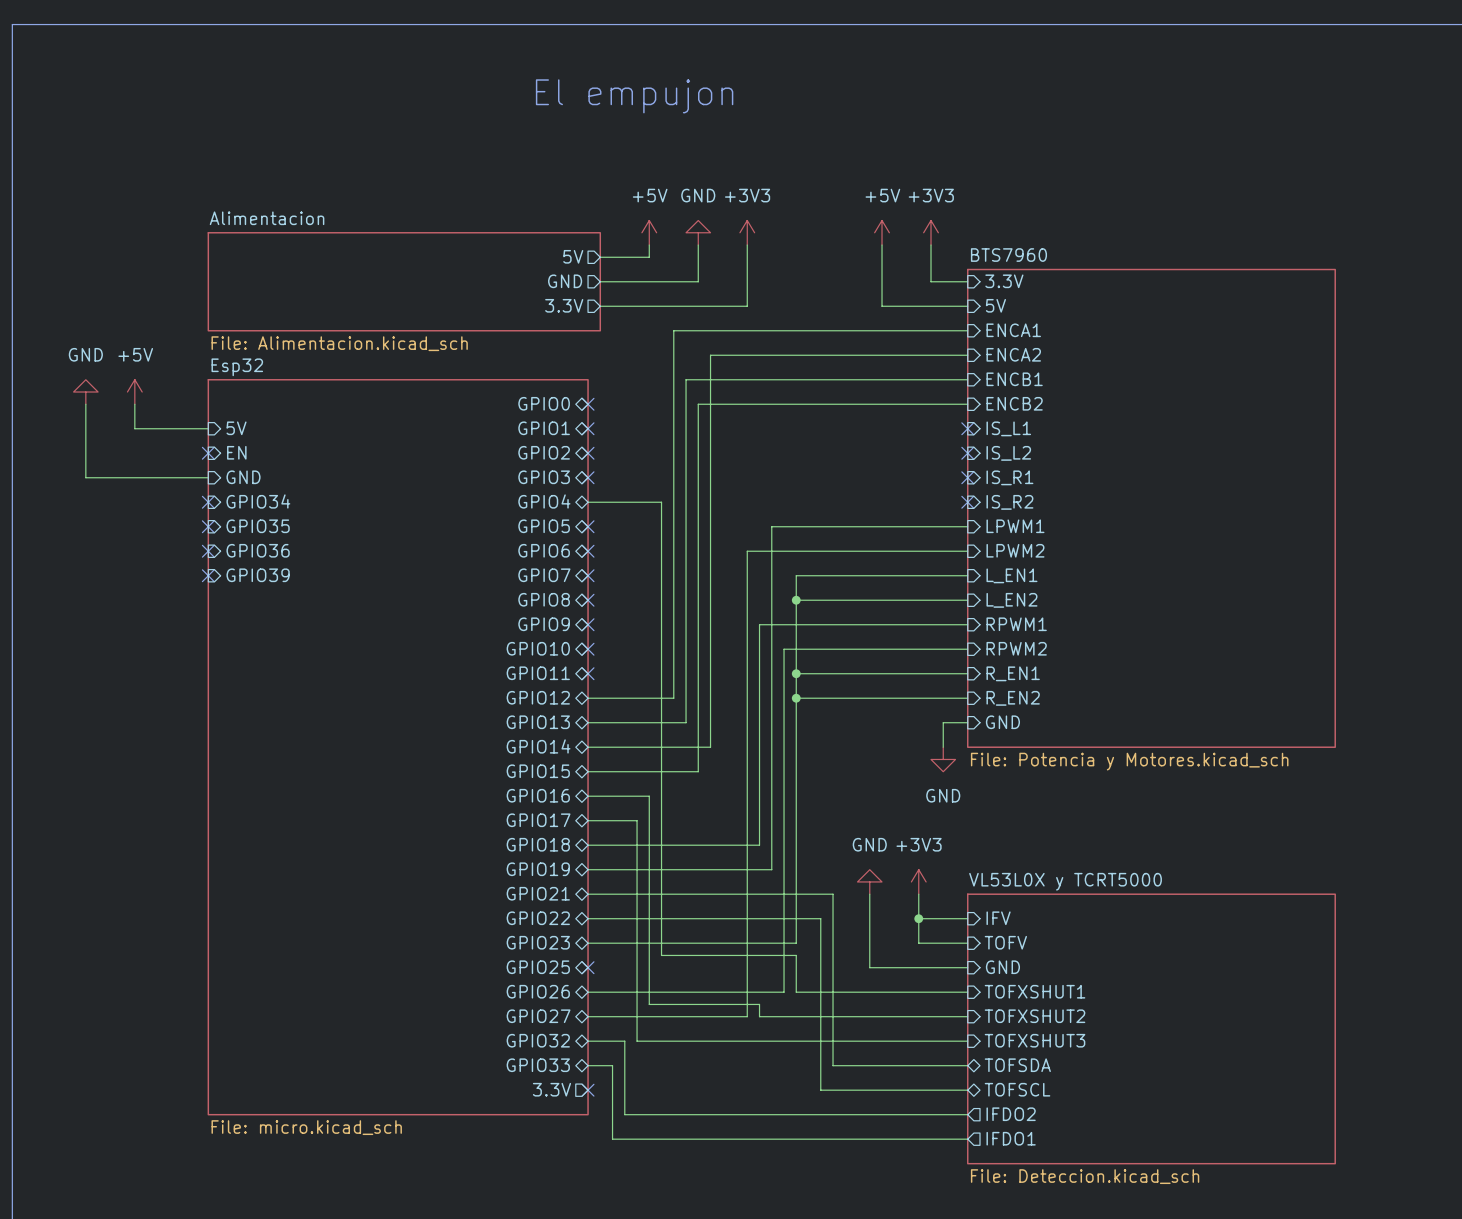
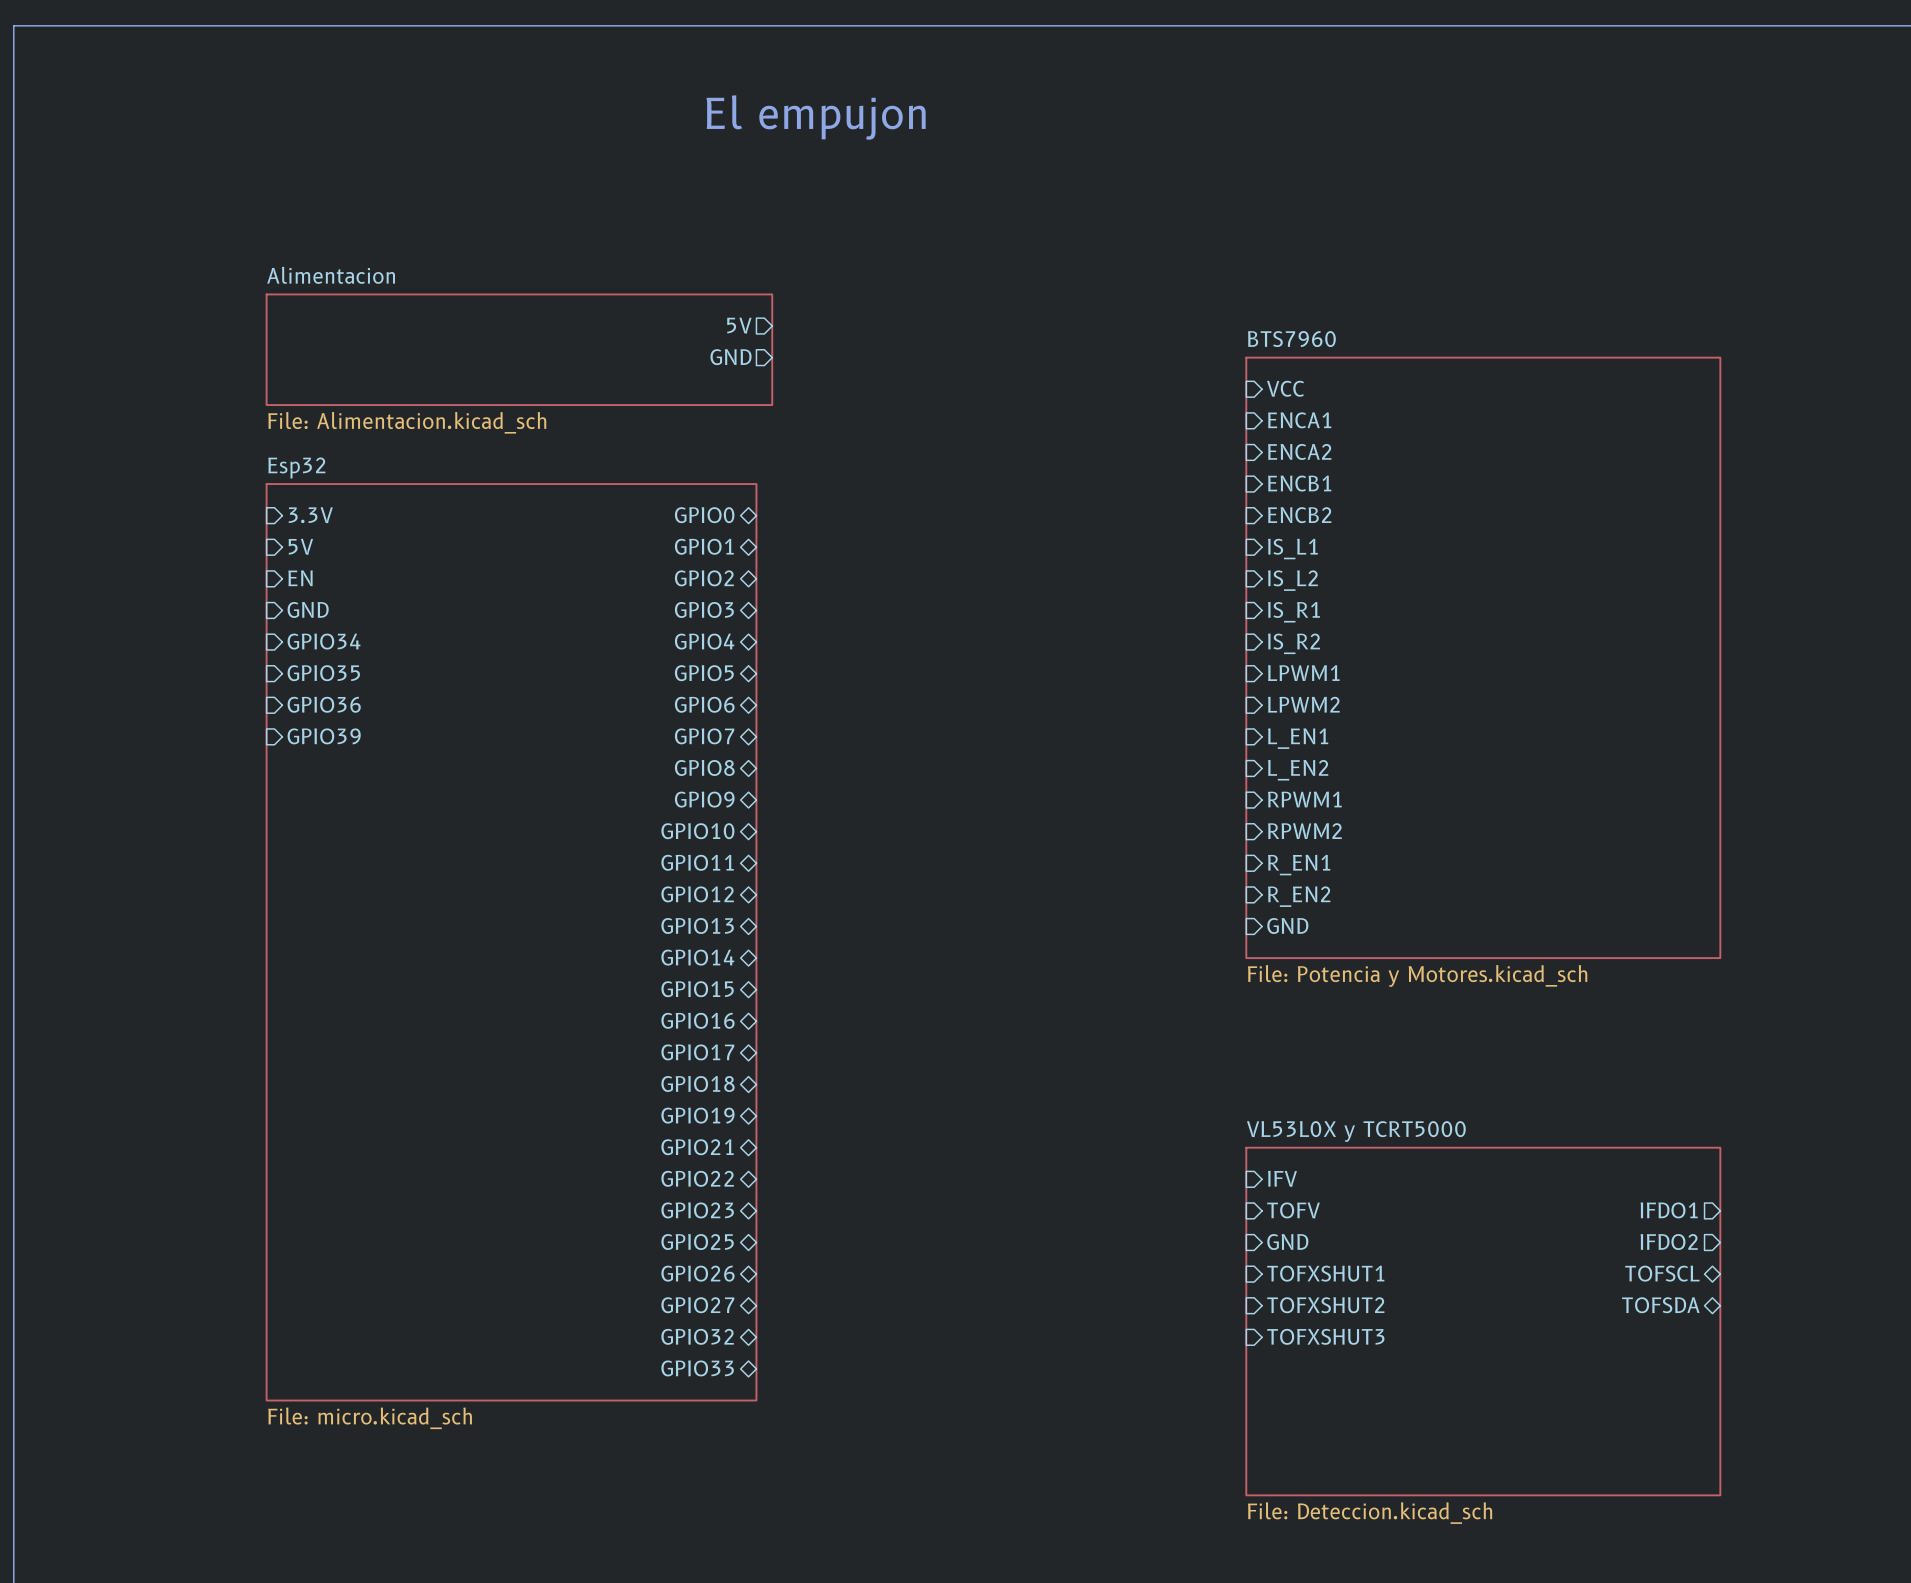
sheet Alimentacion shape: [207, 232, 602, 332] -> [265, 293, 774, 406]
power symbol: +5V (649, 232) -> none
power symbol: GND (698, 232) -> none
power symbol: +3V3 (747, 232) -> none
power symbol: +5V (882, 232) -> none
power symbol: +3V3 (931, 232) -> none
wire: (649, 245) (649, 257) (600, 257) -> none
wire: (698, 245) (698, 281) (600, 281) -> none
wire: (747, 245) (747, 306) (600, 306) -> none
wire: (882, 245) (882, 306) (967, 306) -> none
wire: (931, 245) (931, 281) (967, 281) -> none
sheet BTS7960 shape: [967, 268, 1336, 748] -> [1245, 356, 1722, 960]
sheet pin: 3.3V (1004, 281) -> none
sheet pin: 3.3V (564, 305) -> none
sheet pin: 5V (995, 305) -> VCC (1285, 388)
wire: (967, 330) (673, 330) (673, 698) (588, 698) -> none
wire: (967, 355) (710, 355) (710, 747) (588, 747) -> none
sheet Esp32 shape: [207, 379, 589, 1116] -> [265, 483, 758, 1402]
wire: (967, 379) (686, 379) (686, 722) (588, 722) -> none
power symbol: GND (85, 392) -> none
power symbol: +5V (134, 392) -> none
sheet pin: none -> 3.3V (310, 515)
wire: (85, 404) (85, 477) (208, 477) -> none
wire: (134, 404) (134, 428) (208, 428) -> none
no-connect mark: (588, 404) -> none
wire: (967, 404) (698, 404) (698, 771) (588, 771) -> none
no-connect mark: (588, 428) -> none
no-connect mark: (967, 428) -> none
no-connect mark: (208, 453) -> none
no-connect mark: (588, 453) -> none
no-connect mark: (967, 453) -> none
no-connect mark: (588, 477) -> none
no-connect mark: (967, 477) -> none
no-connect mark: (208, 502) -> none
wire: (588, 502) (661, 502) (661, 955) (796, 955) (796, 992) (967, 992) -> none
no-connect mark: (967, 502) -> none
no-connect mark: (208, 526) -> none
no-connect mark: (588, 526) -> none
wire: (967, 526) (771, 526) (771, 869) (588, 869) -> none
no-connect mark: (208, 551) -> none
no-connect mark: (588, 551) -> none
wire: (967, 551) (747, 551) (747, 1016) (588, 1016) -> none
no-connect mark: (208, 575) -> none
no-connect mark: (588, 575) -> none
wire: (967, 575) (796, 575) (796, 943) (588, 943) -> none
no-connect mark: (588, 600) -> none
wire: (796, 600) (967, 600) -> none
junction: (796, 600) -> none
no-connect mark: (588, 624) -> none
wire: (967, 624) (759, 624) (759, 845) (588, 845) -> none
no-connect mark: (588, 649) -> none
wire: (967, 649) (784, 649) (784, 992) (588, 992) -> none
no-connect mark: (588, 673) -> none
wire: (796, 673) (967, 673) -> none
junction: (796, 673) -> none
wire: (796, 698) (967, 698) -> none
junction: (796, 698) -> none
wire: (967, 722) (943, 722) (943, 747) -> none
power symbol: GND (943, 759) -> none
wire: (588, 796) (649, 796) (649, 1004) (759, 1004) (759, 1016) (967, 1016) -> none
wire: (588, 820) (637, 820) (637, 1041) (967, 1041) -> none
power symbol: GND (869, 881) -> none
power symbol: +3V3 (918, 881) -> none
wire: (588, 894) (833, 894) (833, 1065) (967, 1065) -> none
wire: (869, 894) (869, 967) (967, 967) -> none
wire: (918, 894) (918, 943) (967, 943) -> none
wire: (588, 918) (820, 918) (820, 1090) (967, 1090) -> none
wire: (918, 918) (967, 918) -> none
junction: (918, 918) -> none
sheet pin: none -> IFDO1 (1669, 1210)
no-connect mark: (588, 967) -> none
sheet pin: none -> IFDO2 (1669, 1242)
sheet pin: none -> TOFSCL (1662, 1273)
sheet pin: none -> TOFSDA (1660, 1305)
wire: (588, 1041) (624, 1041) (624, 1114) (967, 1114) -> none
wire: (588, 1065) (612, 1065) (612, 1139) (967, 1139) -> none
sheet pin: TOFSDA (1017, 1065) -> none
sheet pin: 3.3V (551, 1089) -> none
sheet pin: TOFSCL (1017, 1089) -> none
no-connect mark: (588, 1090) -> none
sheet pin: IFDO2 (1011, 1114) -> none
sheet pin: IFDO1 (1011, 1138) -> none

